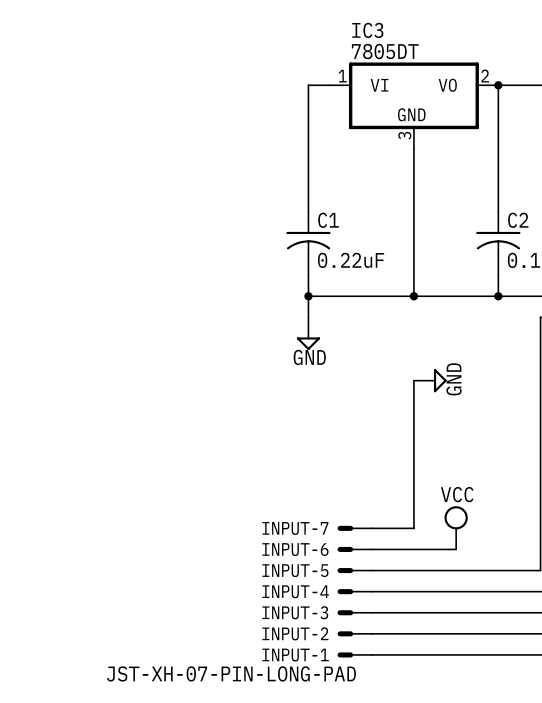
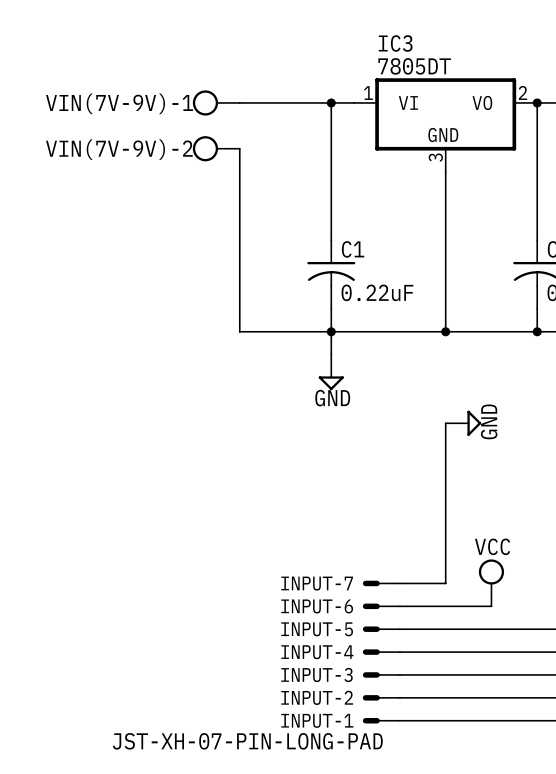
VIN(7V-9V)-1: none -> (216, 102)
wire: none -> (239, 102) (331, 102)
junction: none -> (331, 102)
VIN(7V-9V)-2: none -> (216, 148)
wire: none -> (239, 148) (239, 331) (331, 331)

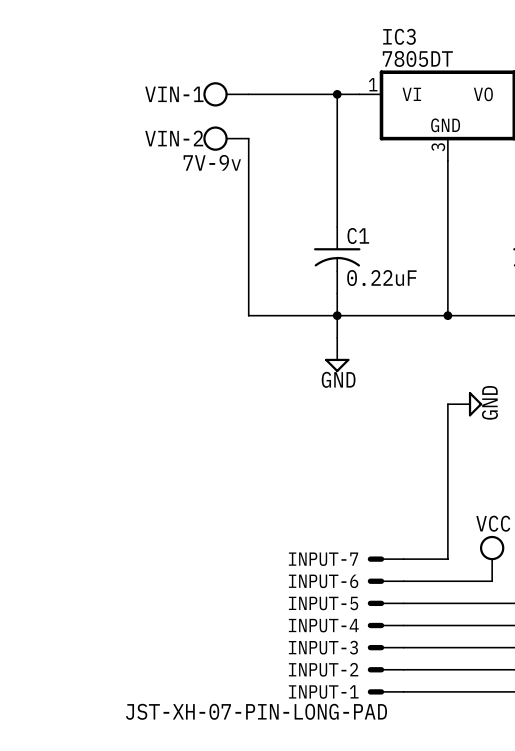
VIN(7V-9V)-1 name: VIN(7V-9V)-1 (119, 103) -> VIN-1 (174, 94)
VIN(7V-9V)-2 name: VIN(7V-9V)-2 (119, 149) -> VIN-2 (174, 138)
VIN(7V-9V)-2 value: none -> 7V-9v (212, 162)

